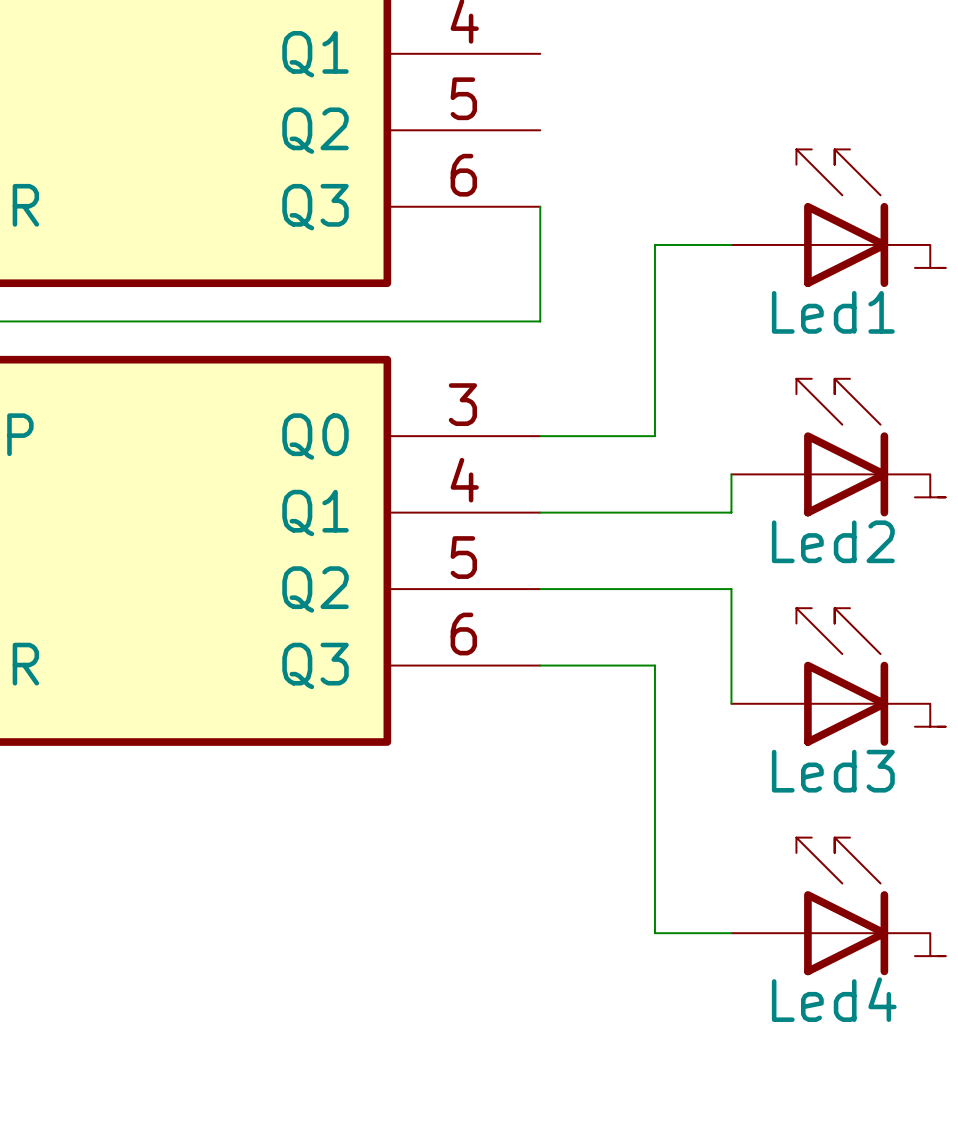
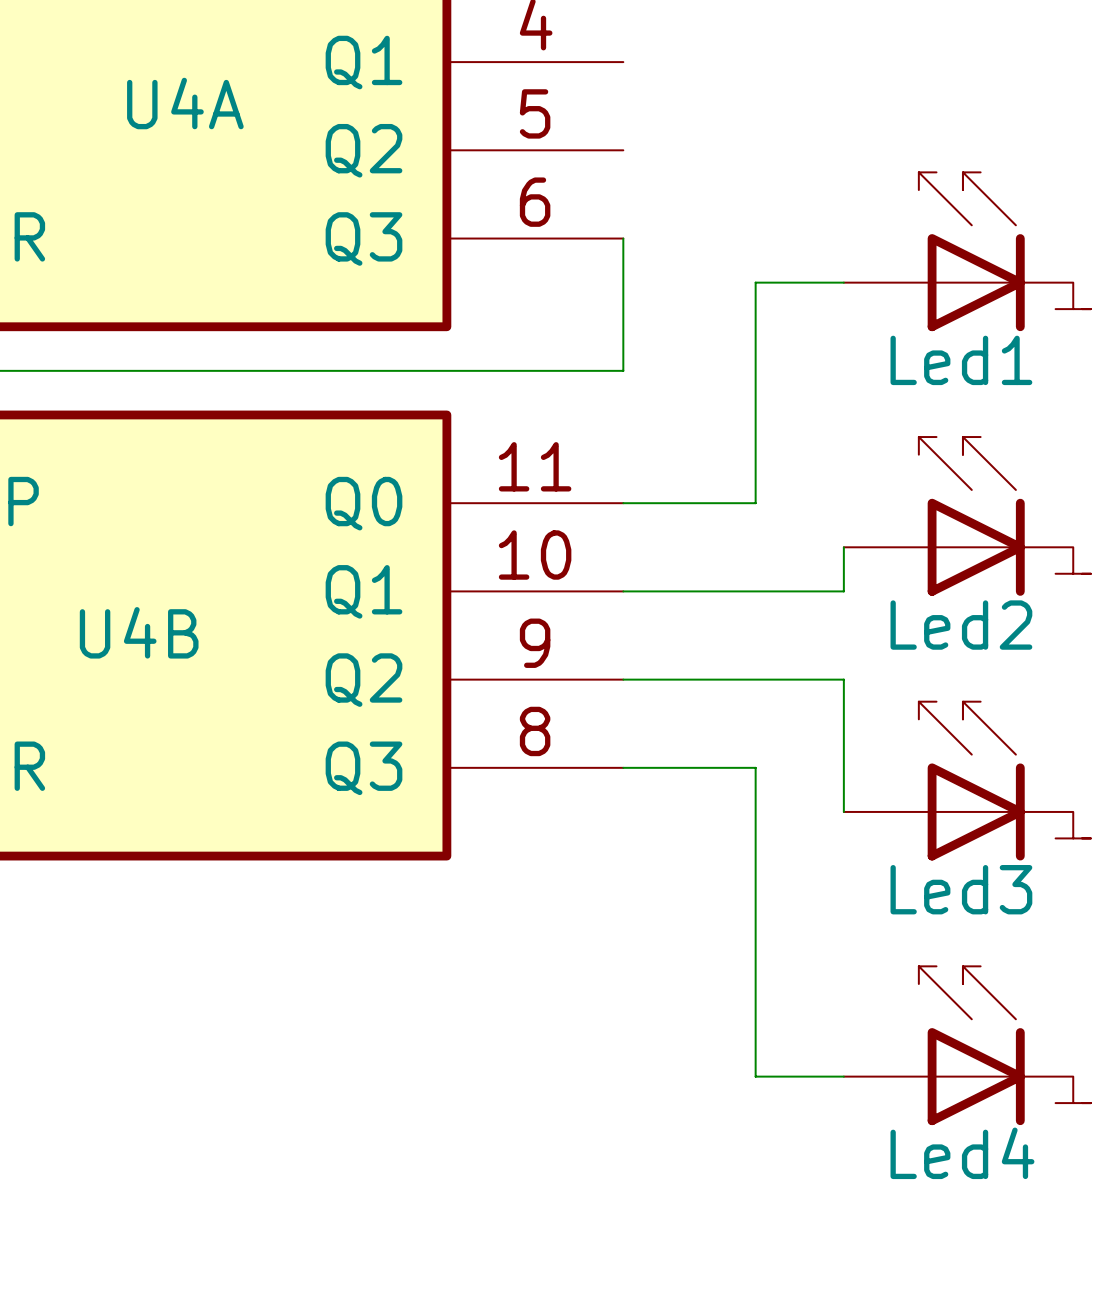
U4A name: none -> U4A (185, 103)
U4B pin number: 3 (462, 404) -> 11 (535, 466)
U4B pin number: 4 (464, 480) -> 10 (535, 555)
U4B name: none -> U4B (139, 632)
U4B pin number: 5 (463, 557) -> 9 (535, 643)
U4B pin number: 6 (463, 634) -> 8 (535, 731)

